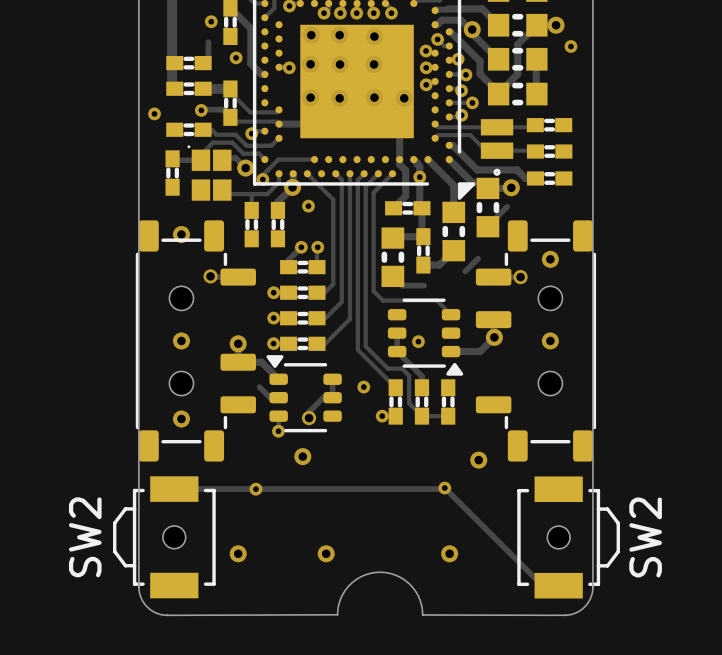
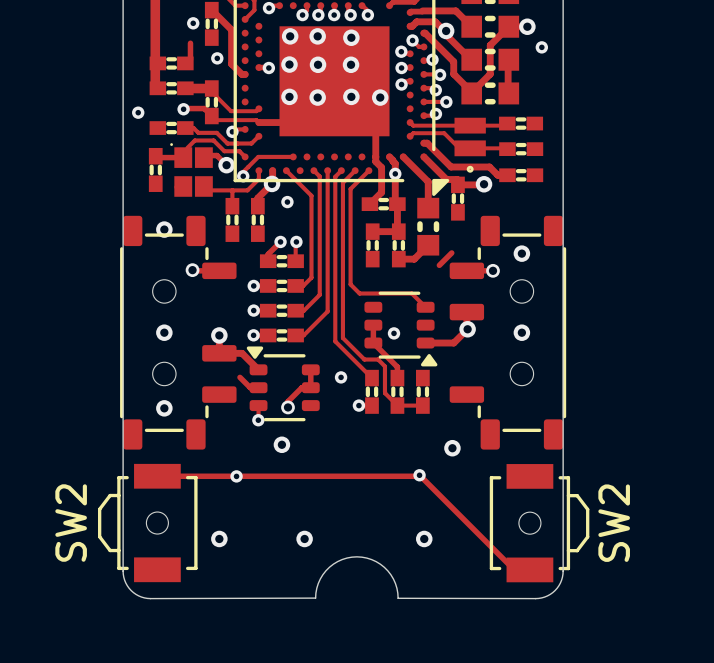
part footprint: [476, 177, 500, 238] -> [451, 176, 465, 221]
track: (507, 206) (494, 219) -> none
part footprint: [381, 227, 405, 288] -> [365, 223, 380, 268]
track: (392, 276) (402, 285) (424, 285) -> none

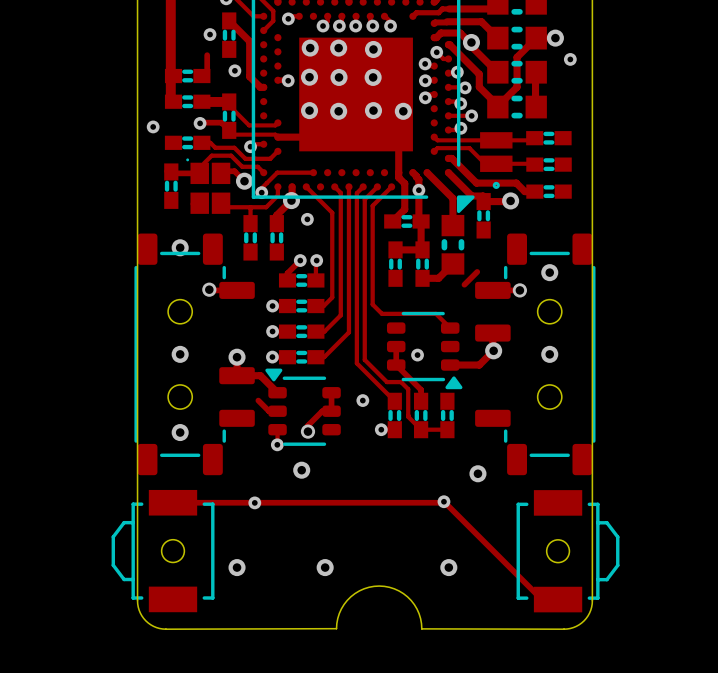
SW2 name: SW2 (71, 523) -> none
SW2 name: SW2 (614, 523) -> none

